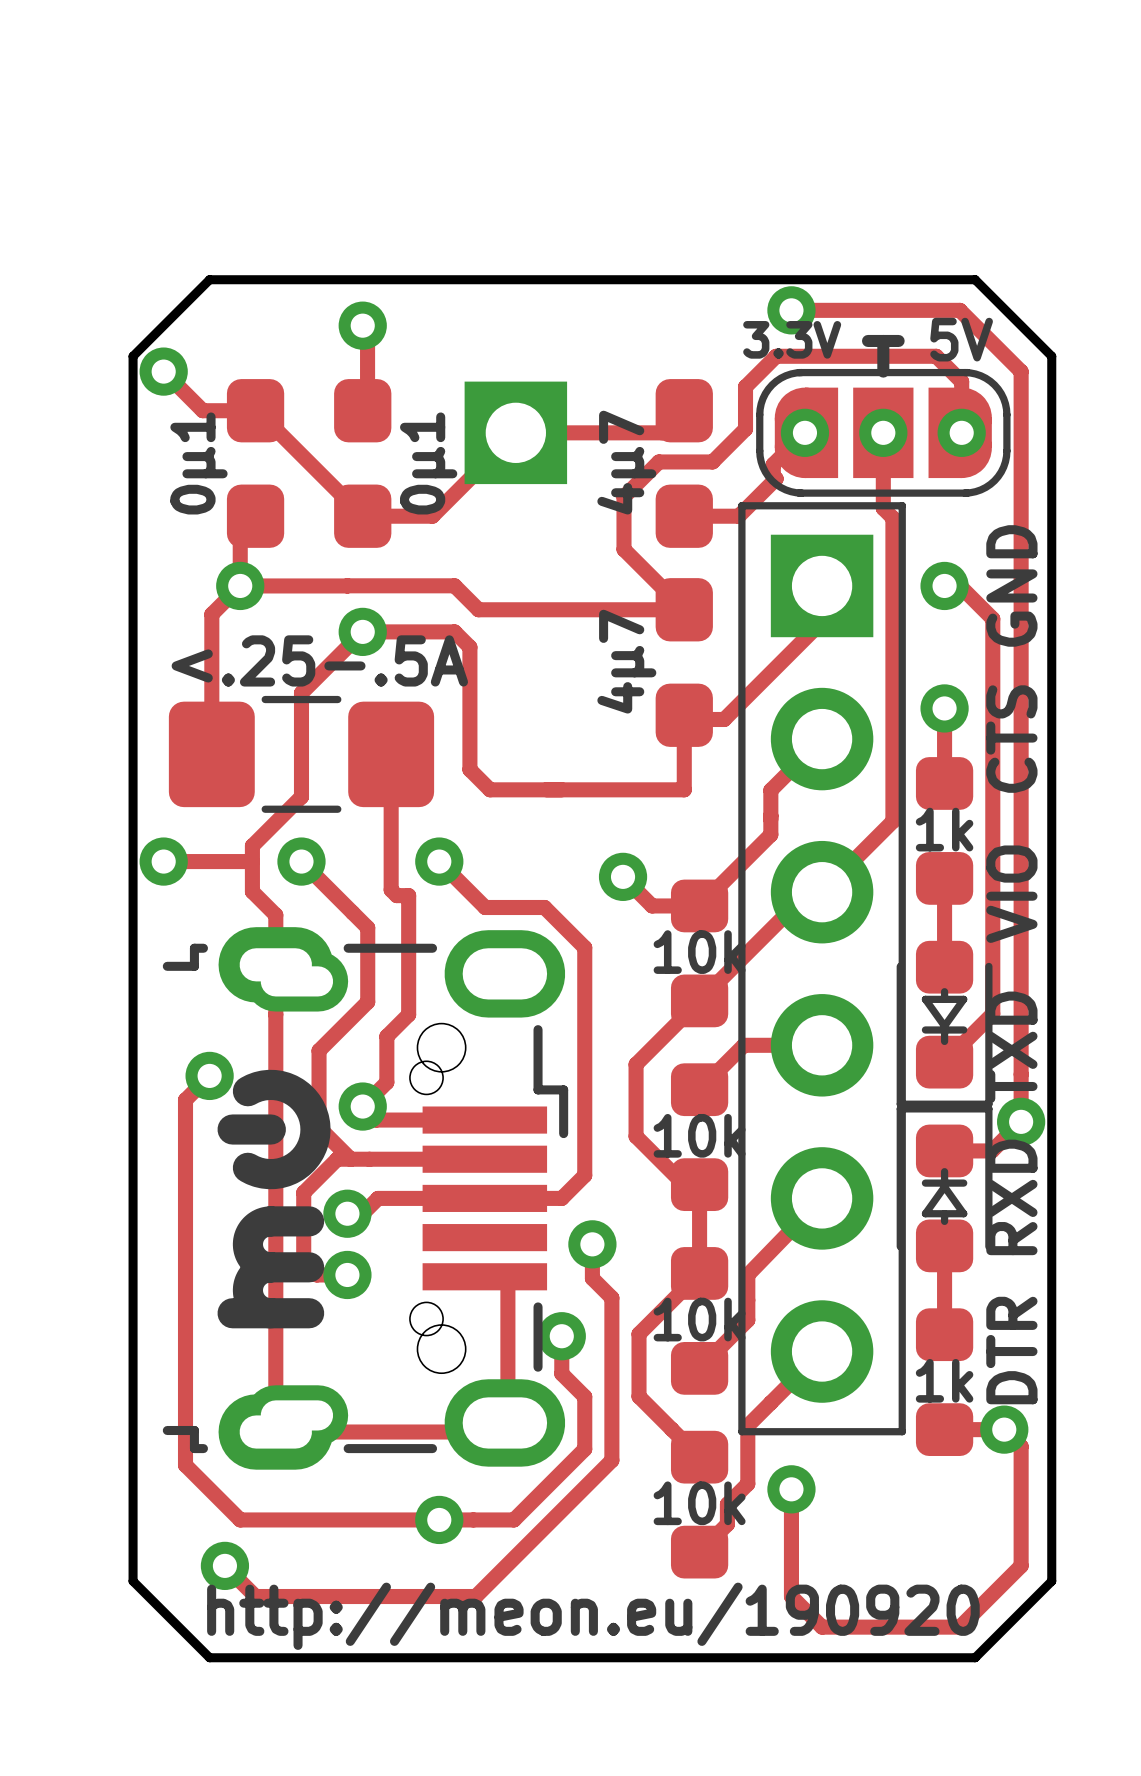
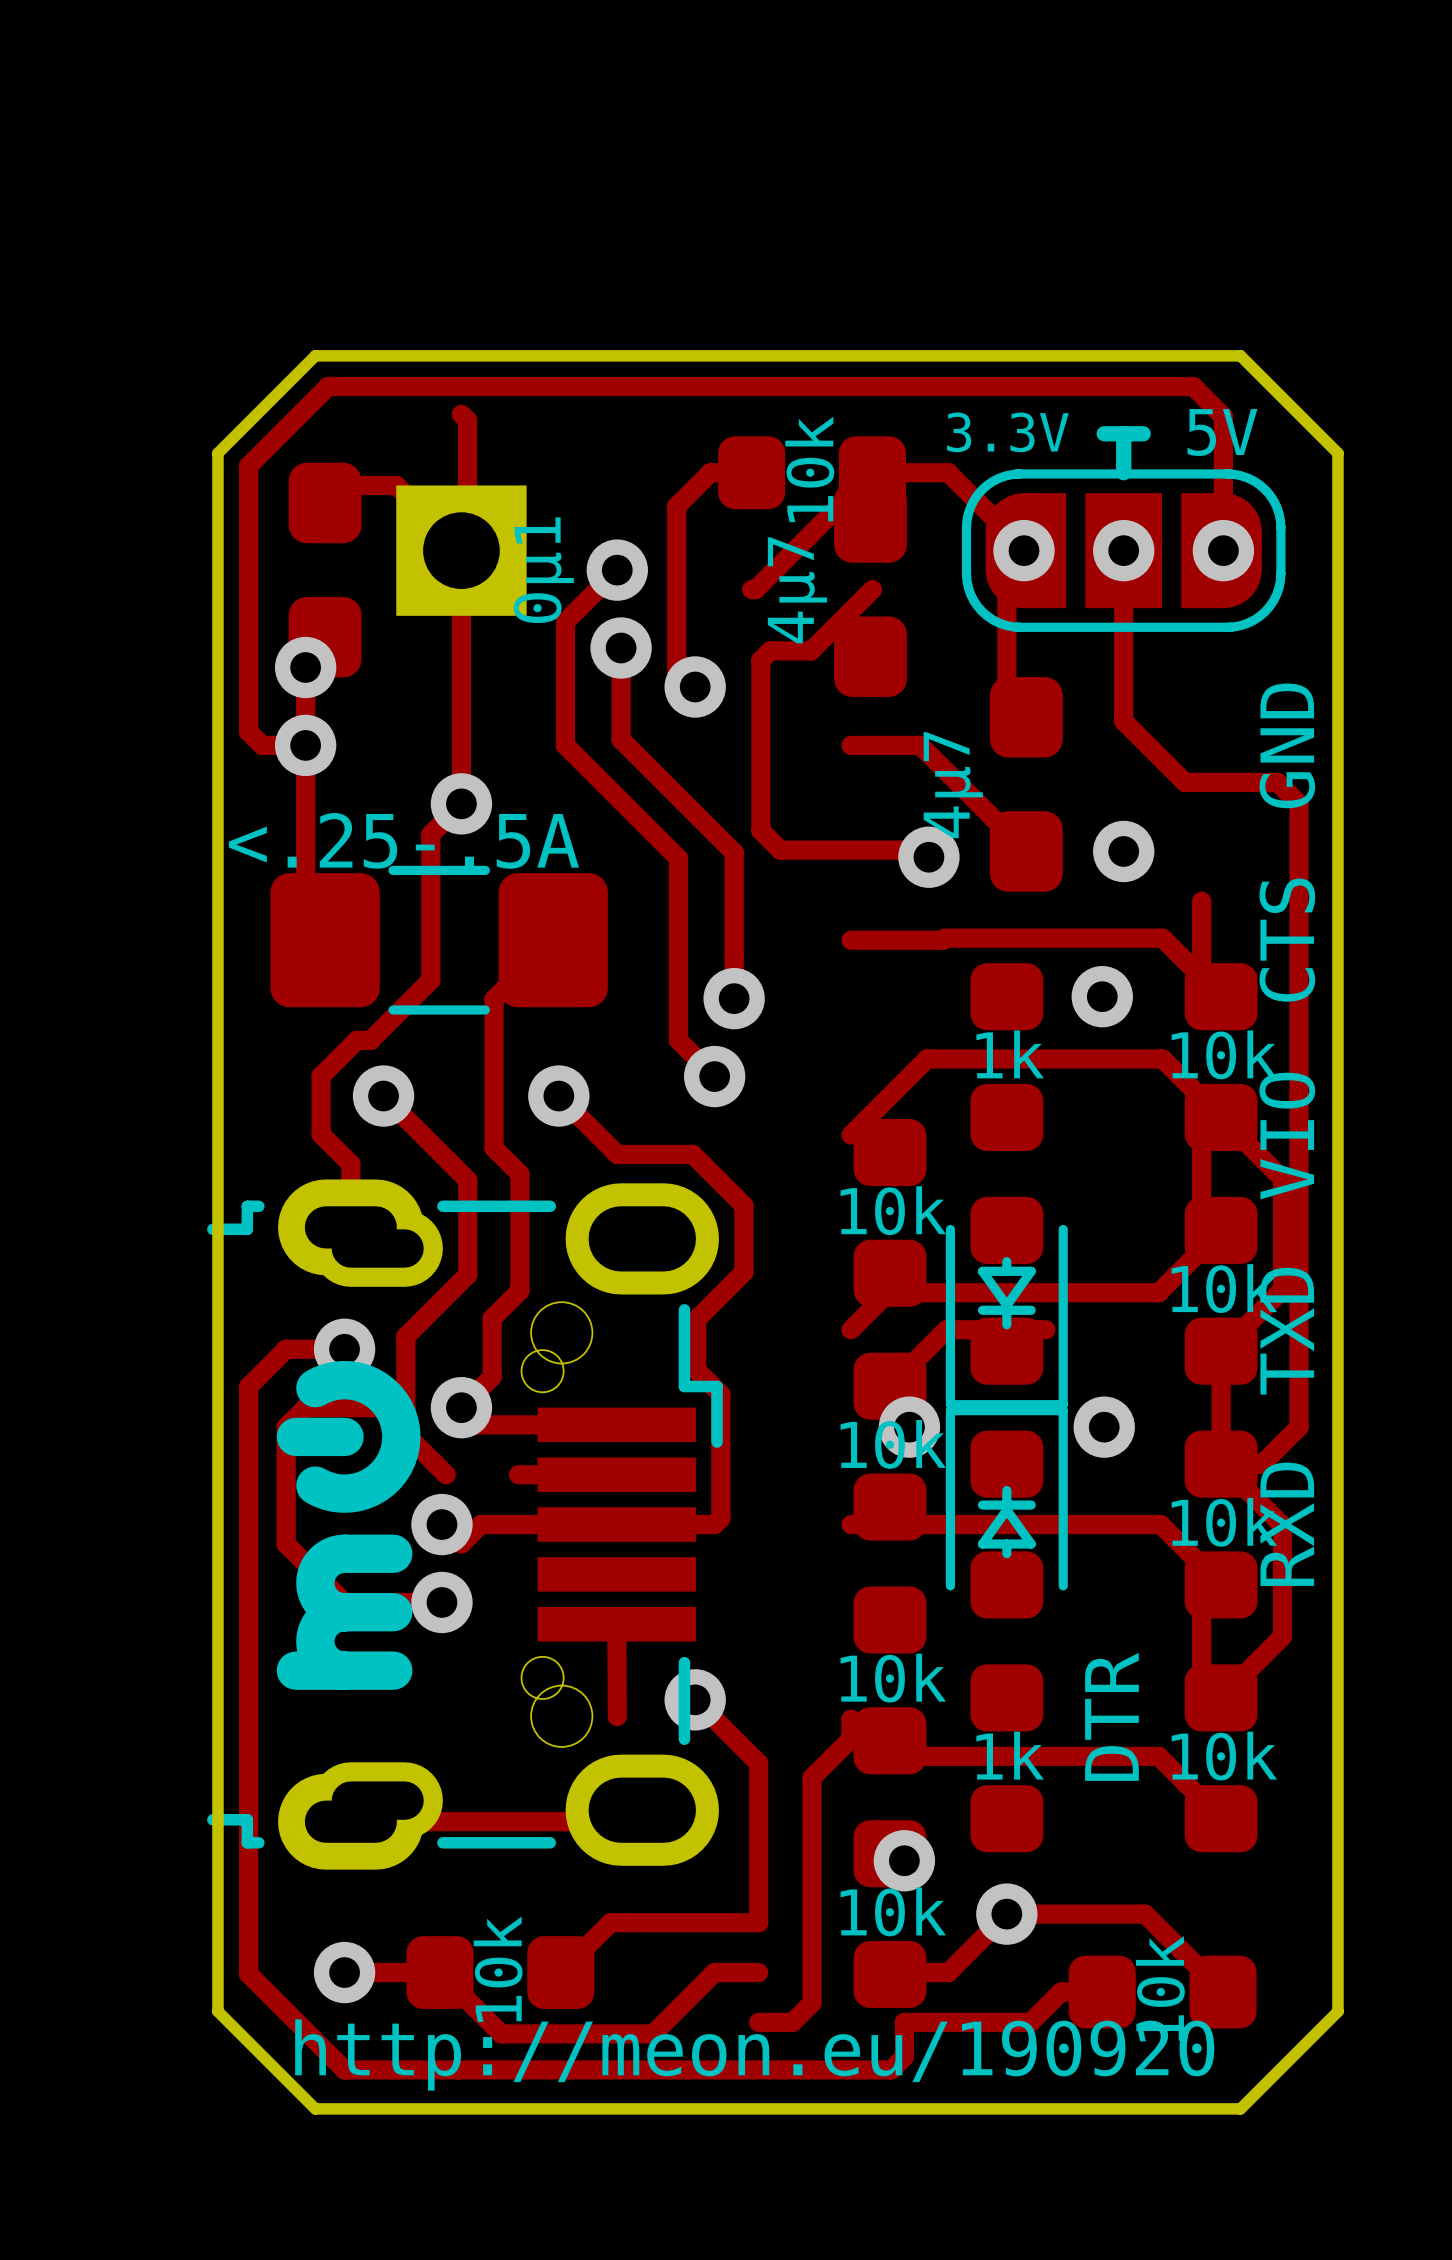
board edge: (247, 279) (209, 279) (133, 356) (133, 1581) (209, 1657) (247, 1657) -> (315, 355) (217, 453) (217, 2011) (315, 2108)
via: (791, 310) -> none
track: (806, 310) (959, 310) (1021, 371) (1021, 631) -> (1123, 646) (1123, 721) (1185, 782) (1277, 782) (1299, 803)
via: (362, 325) -> none
track: (163, 371) (202, 410) (257, 410) (362, 516) (432, 516) (515, 432) (662, 432) (684, 410) -> none
via: (163, 371) -> none
track: none -> (751, 472) (710, 472) (676, 506) (676, 687) (683, 695)
part: none -> 10k (812, 472)
part footprint: [334, 379, 392, 548] -> [396, 485, 527, 616]
track: (961, 381) (936, 356) (776, 356) (745, 386) (745, 429) (712, 461) (658, 461) (623, 496) (623, 549) (684, 609) (478, 609) (454, 585) (240, 585) (211, 614) (211, 754) -> (1223, 485) (1223, 416) (1193, 386) (328, 386) (248, 465) (248, 731) (262, 745) (305, 745) (305, 920) (325, 940)
part: (515, 432) -> none
track: (804, 432) (773, 464) (773, 475) (776, 478) (738, 516) (684, 516) -> none
track: none -> (617, 570) (565, 621) (565, 745) (678, 858) (678, 1040) (714, 1076)
via: none -> (617, 570)
part value: 0μ1 (198, 463) -> none
part position: (255, 463) -> (325, 570)
track: none -> (751, 589) (755, 589) (872, 472) (948, 472) (1026, 550) (1006, 570) (1006, 717)
track: none -> (872, 589) (811, 650) (770, 650) (760, 660) (760, 830) (780, 850) (921, 850) (928, 857)
track: (883, 508) (892, 518) (892, 821) (822, 892) (792, 892) -> none
track: none -> (621, 648) (621, 739) (734, 852) (734, 998)
via: none -> (621, 648)
via: none -> (305, 667)
via: none -> (695, 686)
track: none -> (851, 745) (920, 745) (1026, 851)
track: (822, 585) (822, 621) (724, 719) (688, 719) (684, 723) (684, 789) (490, 789) (469, 769) (469, 647) (454, 631) (362, 631) -> (305, 485) (396, 485) (461, 550) (461, 803)
via: (944, 585) -> none
track: (959, 585) (992, 618) (992, 1013) (944, 1062) -> none
track: (338, 656) (301, 693) (301, 796) (280, 817) -> (430, 834) (430, 980) (370, 1040) (356, 1040)
part position: (684, 662) -> (1026, 784)
via: none -> (1123, 851)
via: none -> (928, 857)
via: (944, 708) -> none
track: none -> (851, 940) (1162, 938) (1221, 996)
track: (822, 739) (770, 790) (770, 834) (699, 905) (652, 905) (623, 876) -> none
part position: (301, 754) -> (439, 940)
track: (384, 760) (391, 754) (391, 889) (396, 895) (408, 895) (408, 922) -> (553, 940) (494, 999) (494, 1148) (519, 1173)
via: none -> (1102, 996)
via: none -> (734, 998)
part value: 1k (944, 829) -> 10k (1224, 1054)
part: none -> 1k (1006, 1057)
part position: (944, 830) -> (1221, 1057)
via: none -> (714, 1076)
track: (163, 861) (252, 861) -> none
via: (163, 861) -> none
via: (623, 876) -> none
track: none -> (851, 1134) (927, 1058) (1162, 1058) (1282, 1178) (1282, 1289) (1221, 1351) (1221, 1464) (1282, 1525) (1282, 1636) (1221, 1697)
track: (808, 892) (636, 1064) (636, 1136) (684, 1184) -> none
part footprint: [896, 940, 993, 1108] -> [1184, 1196, 1258, 1385]
track: (275, 964) (275, 1432) -> none
track: none -> (1221, 1230) (1158, 1292) (888, 1292) (851, 1329)
part: (821, 968) -> none
track: (584, 1000) (584, 1175) (566, 1193) -> (743, 1272) (696, 1319) (696, 1370) (720, 1394) (720, 1518)
part value: none -> 10k (1224, 1288)
part: none -> (1006, 1303)
track: none -> (344, 1349) (286, 1349) (266, 1368)
via position: (209, 1075) -> (344, 1349)
track: (195, 1090) (185, 1100) (185, 1465) (240, 1519) (513, 1519) (584, 1449) (584, 1396) (561, 1373) (561, 1336) -> (248, 1386) (248, 1974) (344, 2069) (891, 2069) (904, 2056) (904, 2022) (1030, 2022) (1061, 1992) (1102, 1992)
part footprint: [896, 1105, 993, 1273] -> [1184, 1430, 1258, 1619]
track: none -> (405, 1407) (305, 1407) (286, 1427) (286, 1544) (344, 1602) (441, 1602)
via: none -> (909, 1427)
via: none -> (1104, 1427)
via: (1021, 1121) -> none
track: (407, 1159) (337, 1159) (303, 1192) (303, 1261) (316, 1274) (347, 1274) -> none
track: (699, 1184) (699, 1273) (639, 1334) (639, 1396) (699, 1457) -> none
part: none -> (1006, 1512)
part value: none -> 10k (1224, 1522)
track: none -> (851, 1524) (1160, 1524) (1221, 1584)
track: (822, 1198) (747, 1274) (747, 1320) (699, 1368) -> none
via position: (347, 1213) -> (441, 1524)
track: (592, 1244) (592, 1278) (611, 1297) (611, 1460) (475, 1596) (255, 1596) (224, 1565) -> none
via: (592, 1244) -> none
via position: (347, 1274) -> (441, 1602)
track: none -> (616, 1624) (617, 1716)
track: (507, 1276) (507, 1419) -> none
track: none -> (695, 1699) (758, 1763) (758, 1922) (610, 1922) (560, 1972)
via position: (561, 1336) -> (695, 1699)
text position: DTR (1011, 1350) -> DTR (1111, 1716)
track: (822, 1351) (747, 1425) (747, 1483) (727, 1504) (727, 1524) (699, 1552) -> none
part value: 1k (944, 1380) -> 10k (1224, 1756)
part: none -> 1k (1006, 1758)
part position: (944, 1382) -> (1221, 1758)
track: (944, 1429) (1004, 1429) (1021, 1446) (1021, 1565) (959, 1627) (822, 1627) (791, 1596) (791, 1504) -> none
track: none -> (1221, 1818) (1158, 1756) (888, 1756) (851, 1719) (851, 1738) (812, 1777) (812, 2002) (792, 2022) (758, 2022)
via: (1004, 1429) -> none
via: none -> (904, 1860)
via position: (791, 1489) -> (1006, 1914)
via: (439, 1519) -> none
track: none -> (344, 1972) (440, 1972) (501, 2033) (653, 2033) (714, 1972) (758, 1972)
part: none -> 10k (500, 1972)
track: none -> (904, 1972) (948, 1972) (1006, 1914) (1145, 1914) (1223, 1992)
via position: (224, 1565) -> (344, 1972)
part: none -> 10k (1162, 1992)

